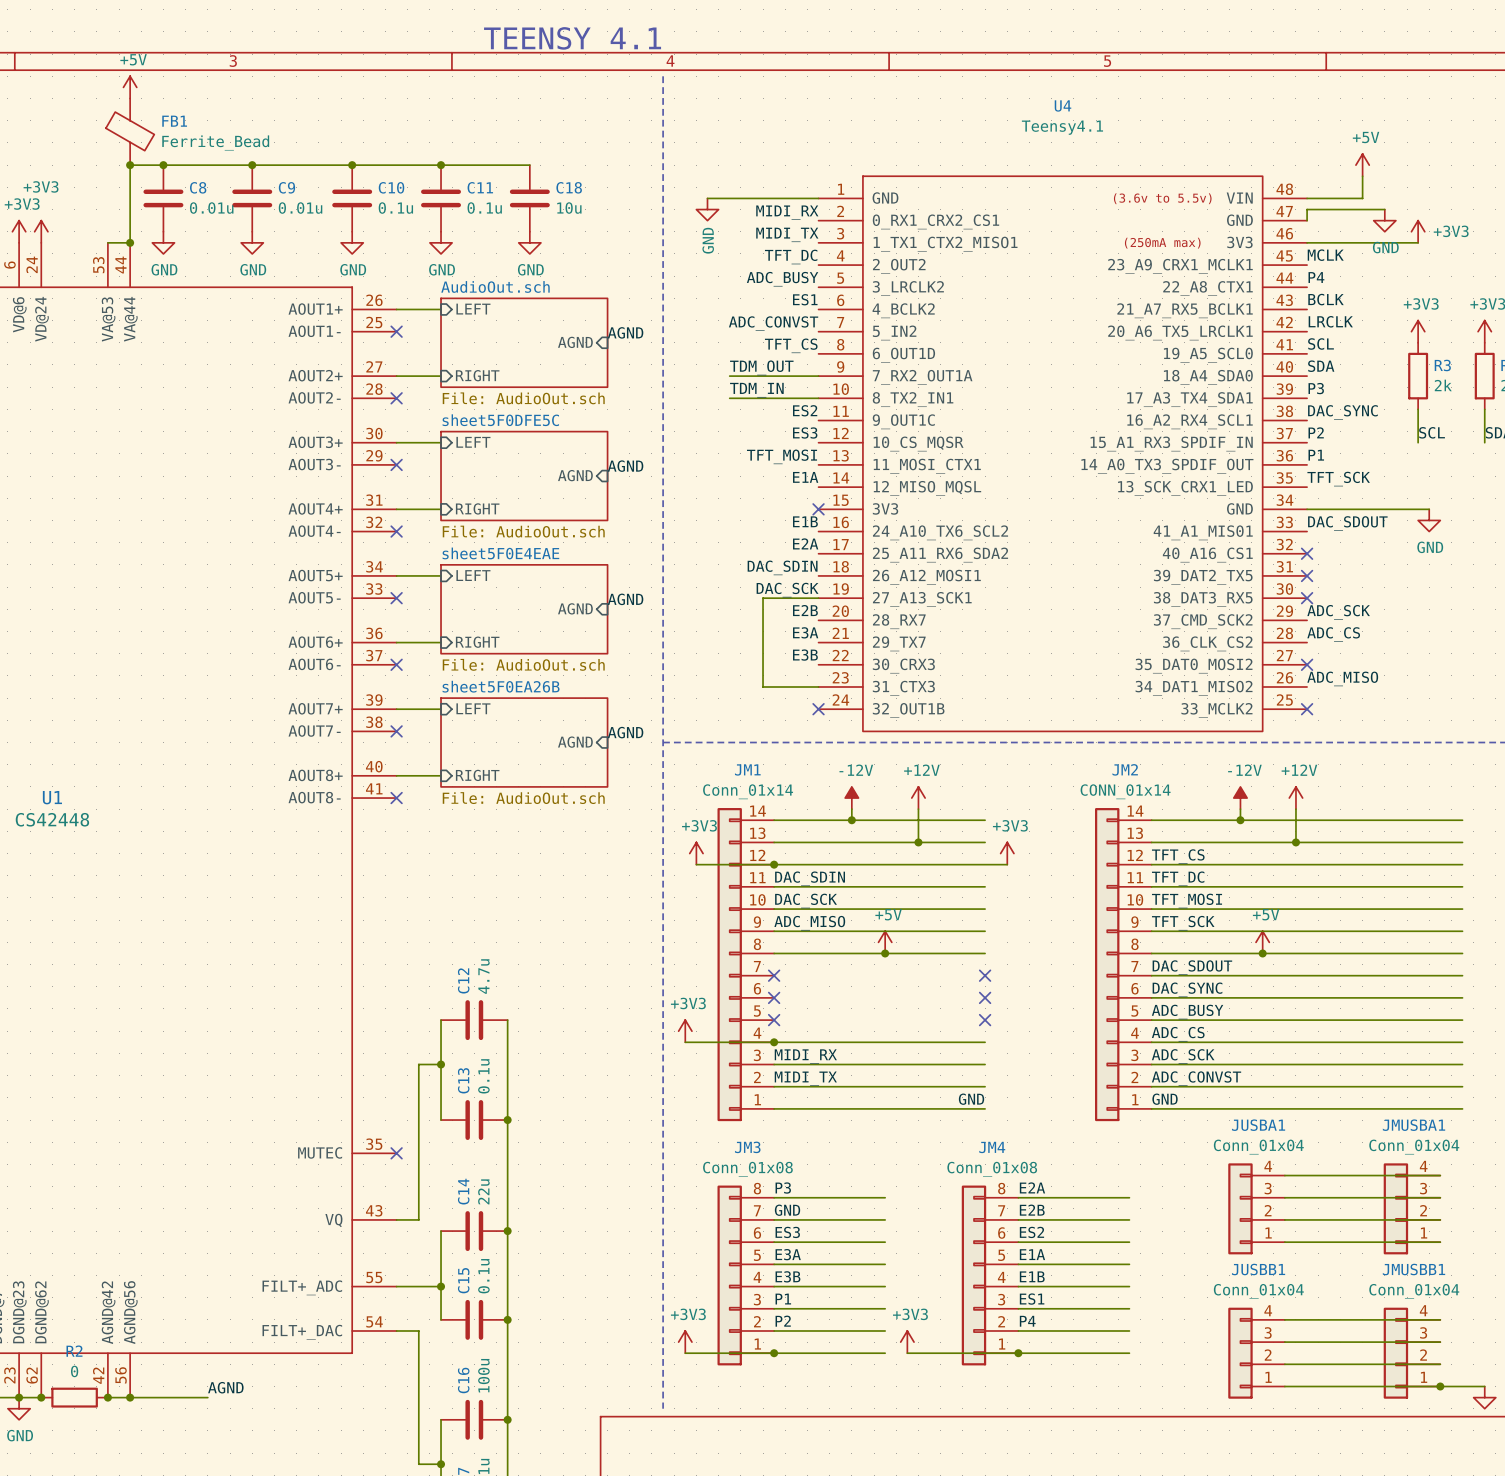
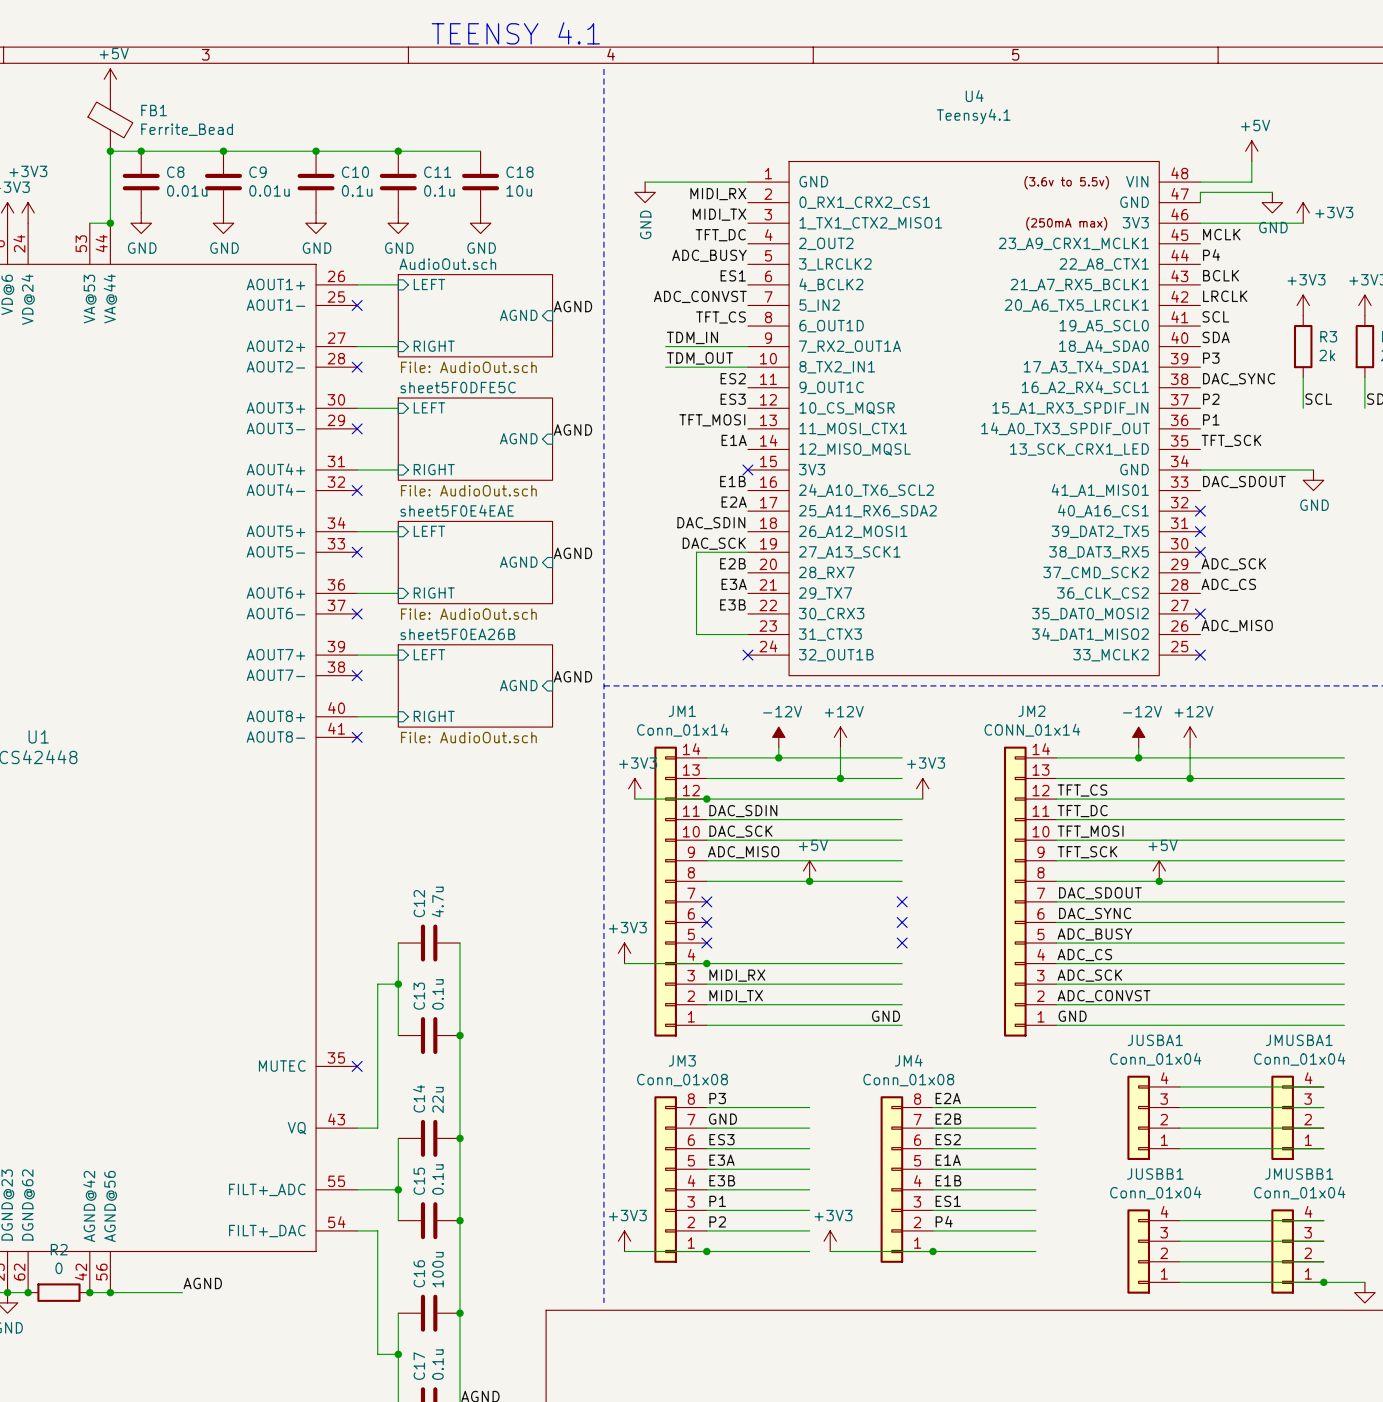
label: TDM_OUT (761, 367) -> TDM_IN (692, 337)
label: TDM_IN (756, 390) -> TDM_OUT (700, 358)

